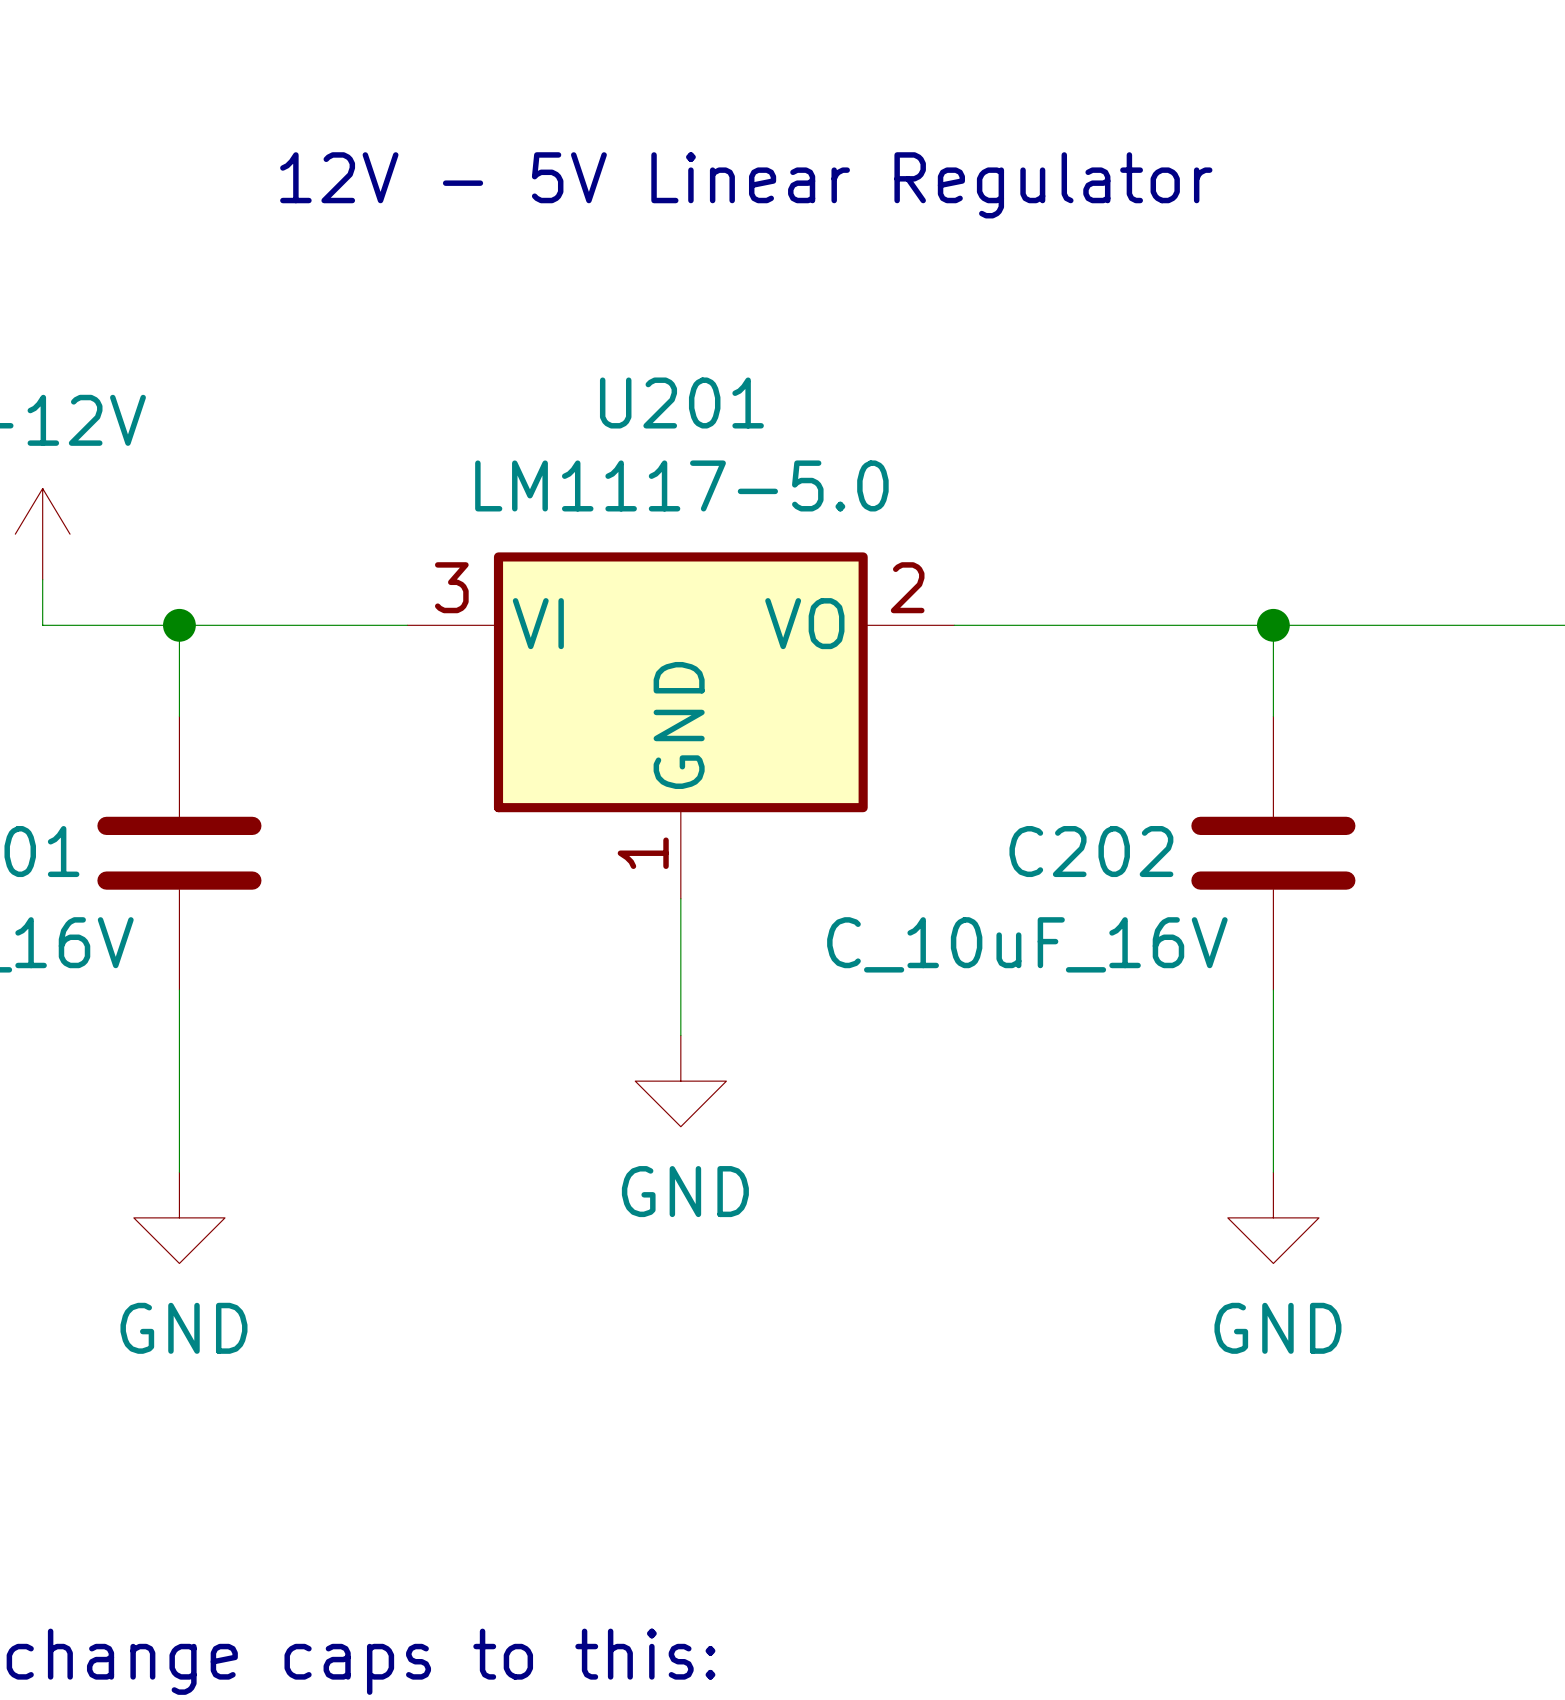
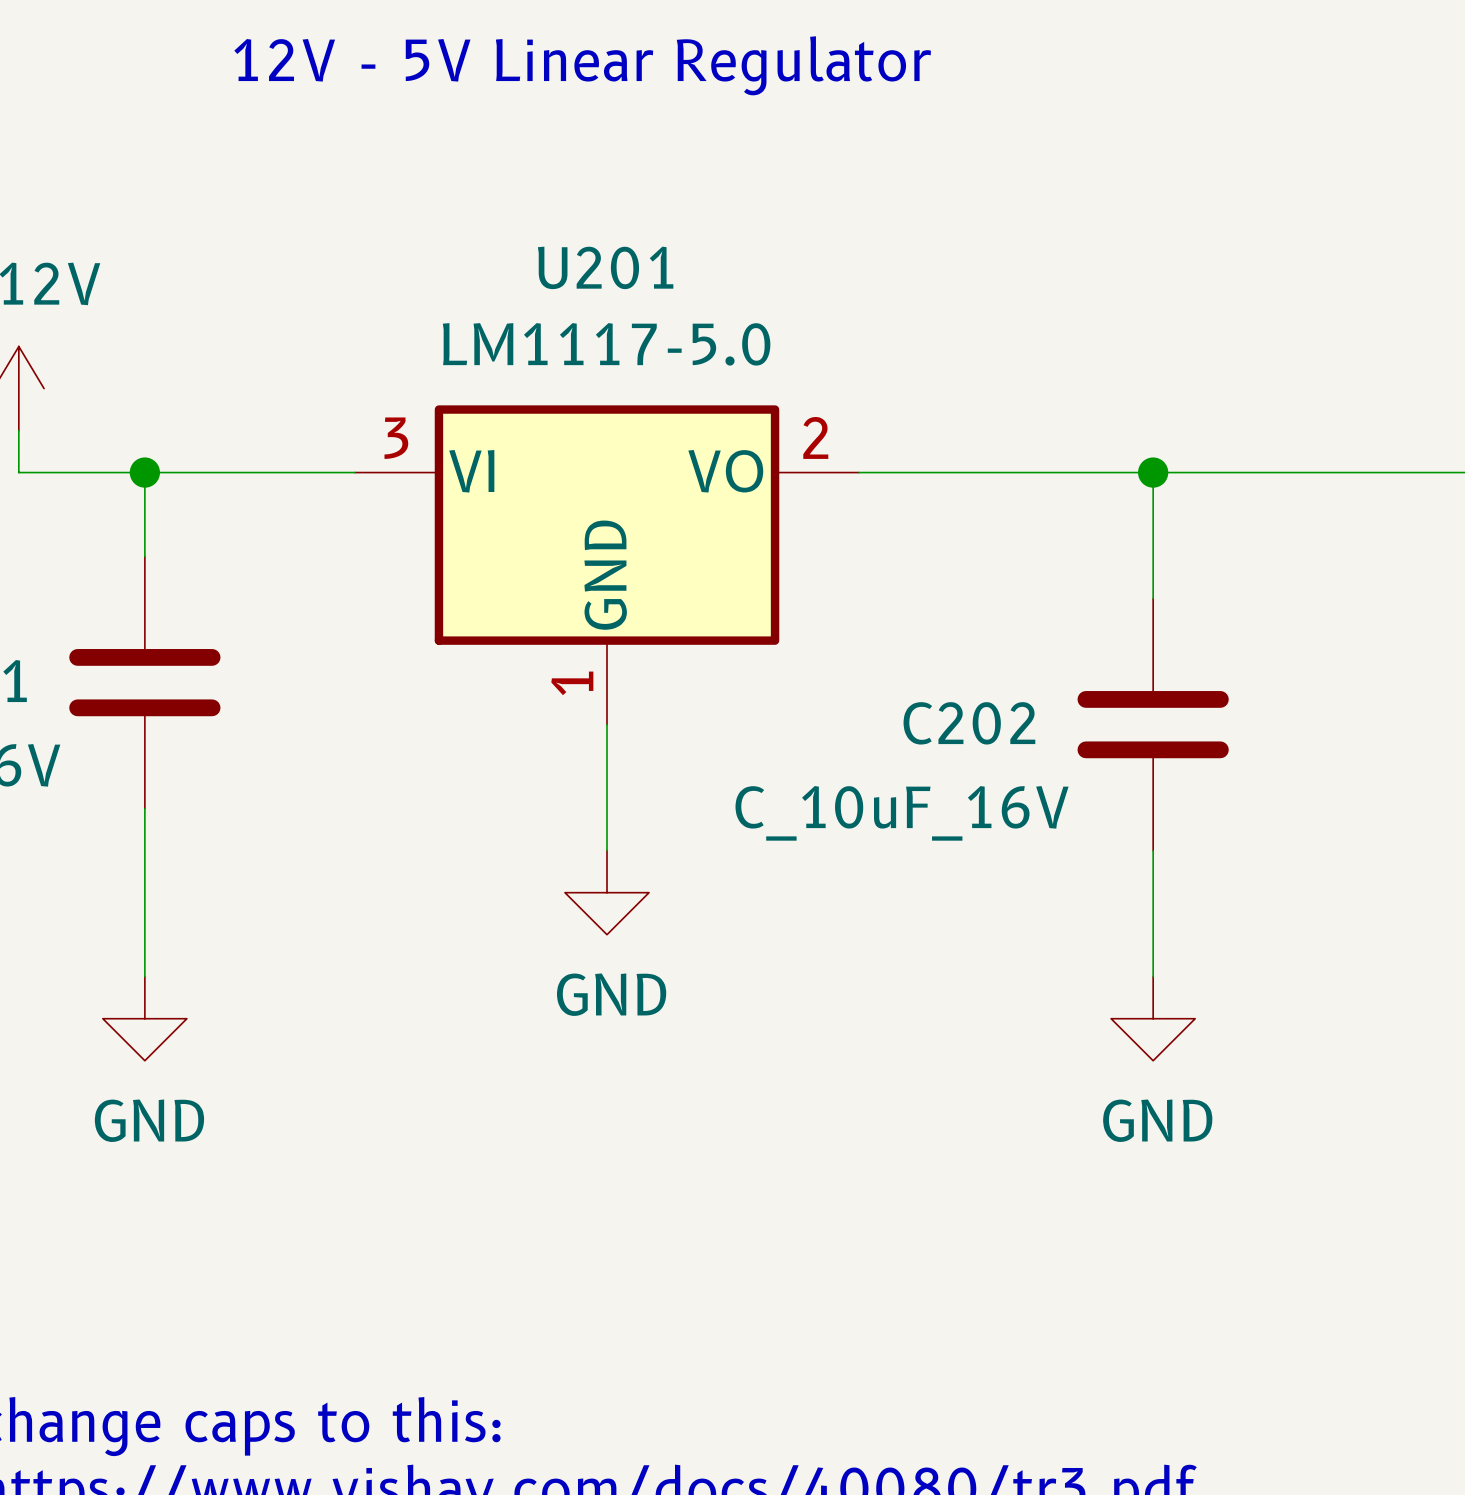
C202 position: (1273, 853) -> (1153, 724)

